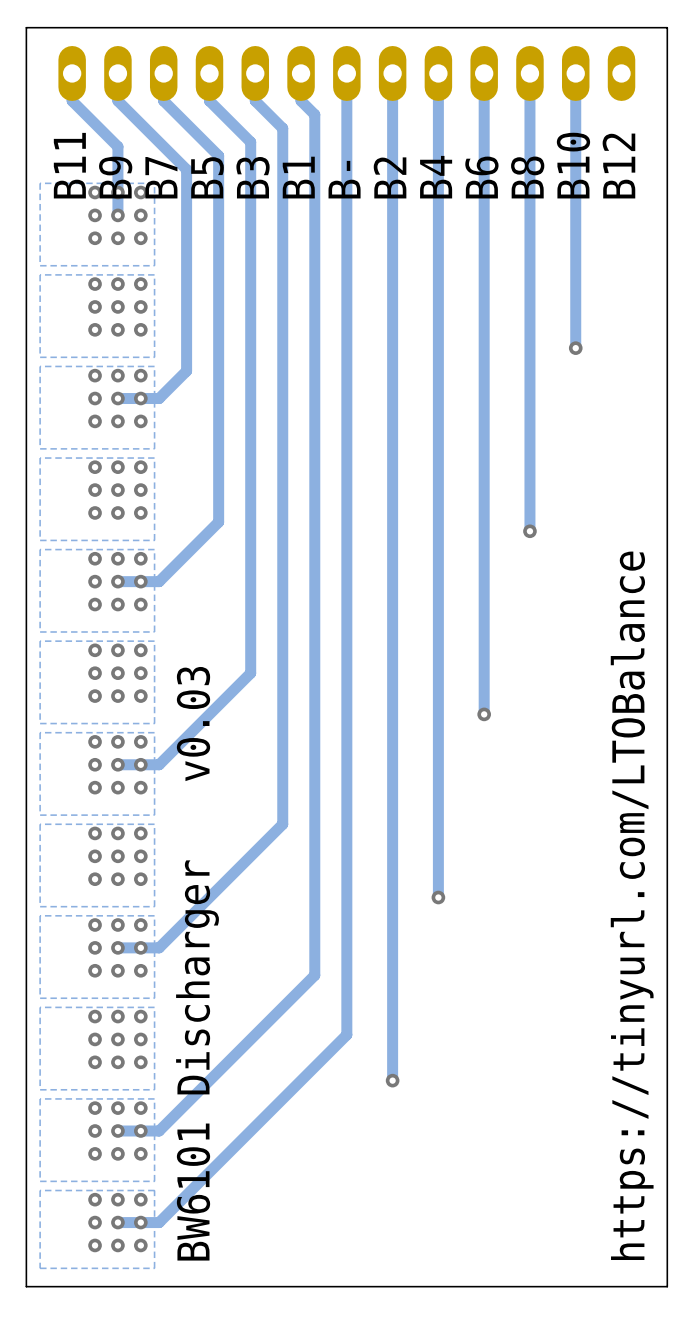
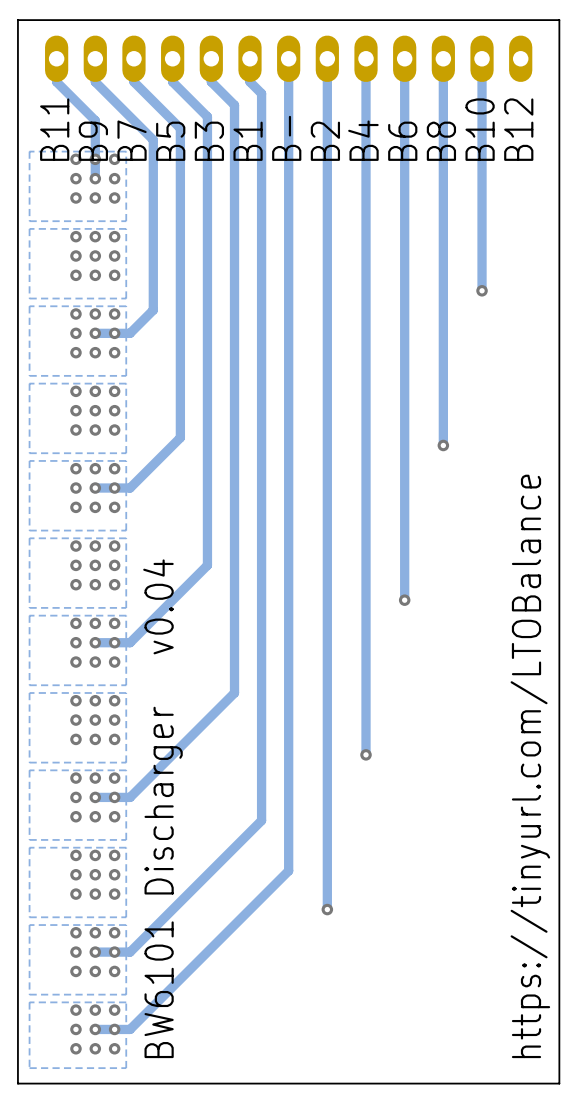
text: v0.03 (193, 724) -> v0.04 (158, 606)

